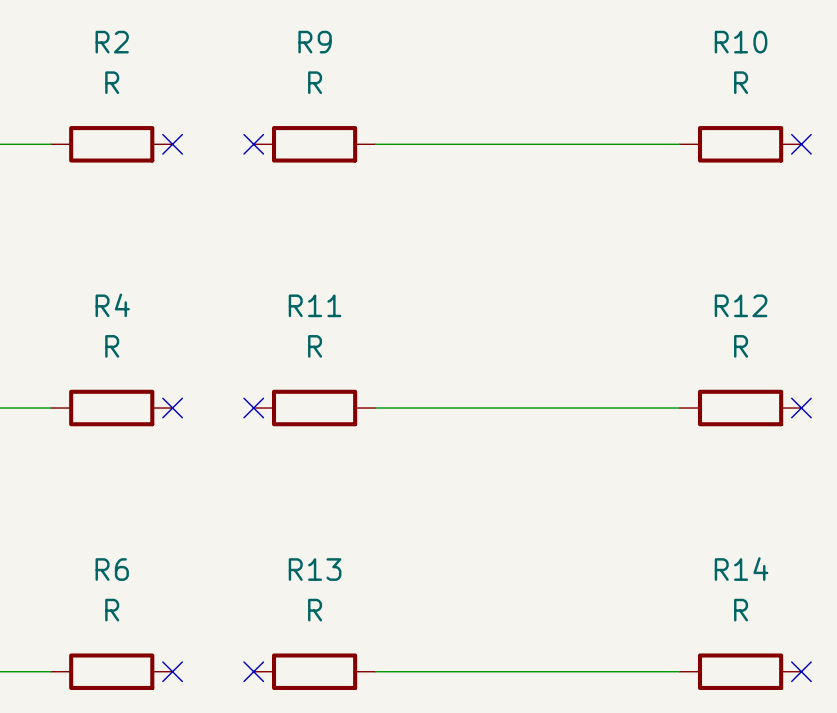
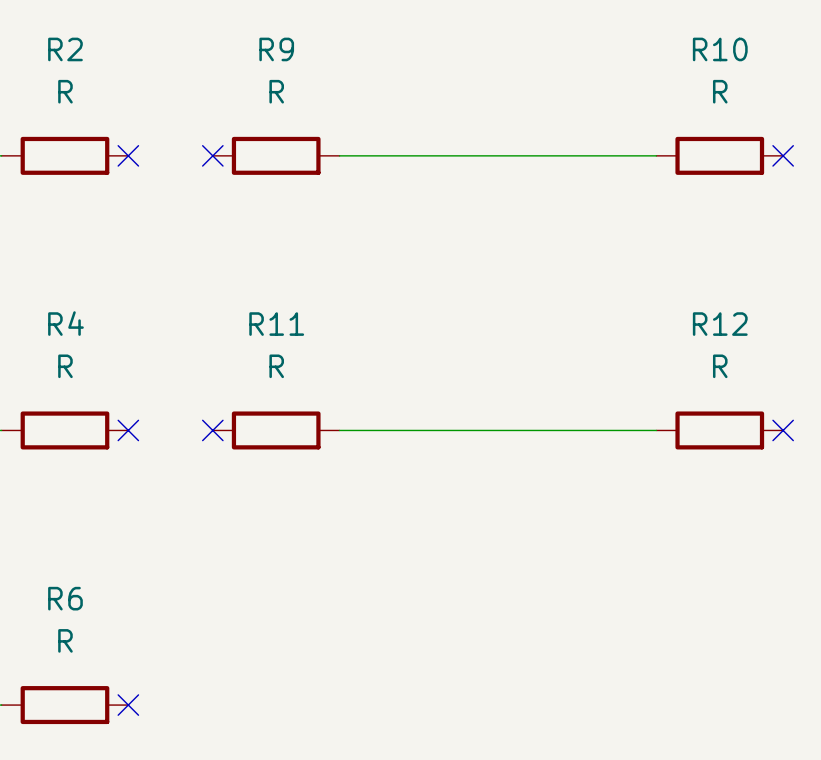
no-connect mark: (253, 671) -> none
R13: R (314, 671) -> none
wire: (375, 671) (679, 671) -> none
R14: R (740, 671) -> none
no-connect mark: (801, 671) -> none

